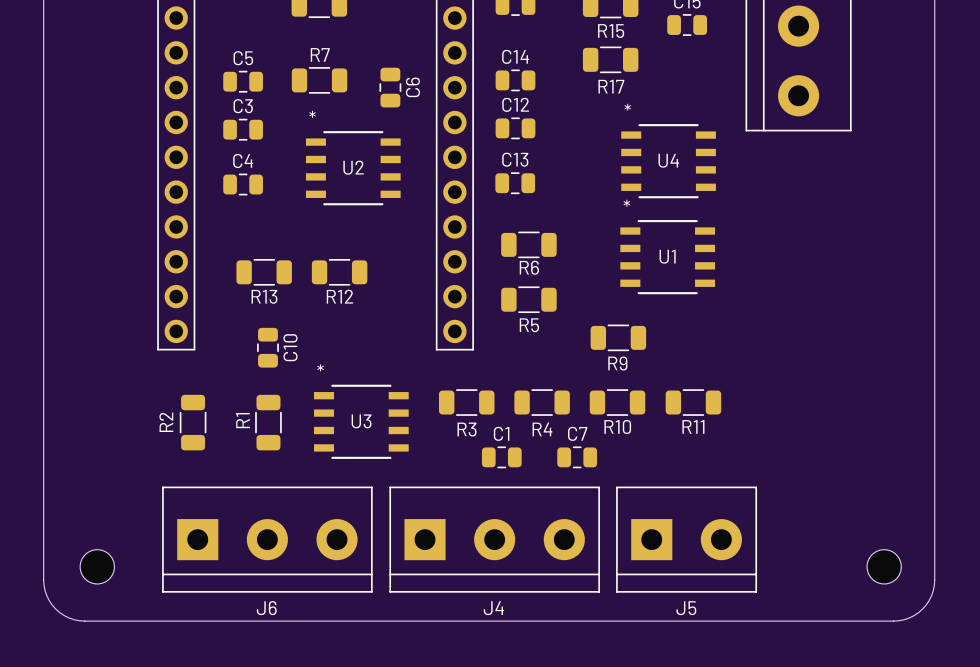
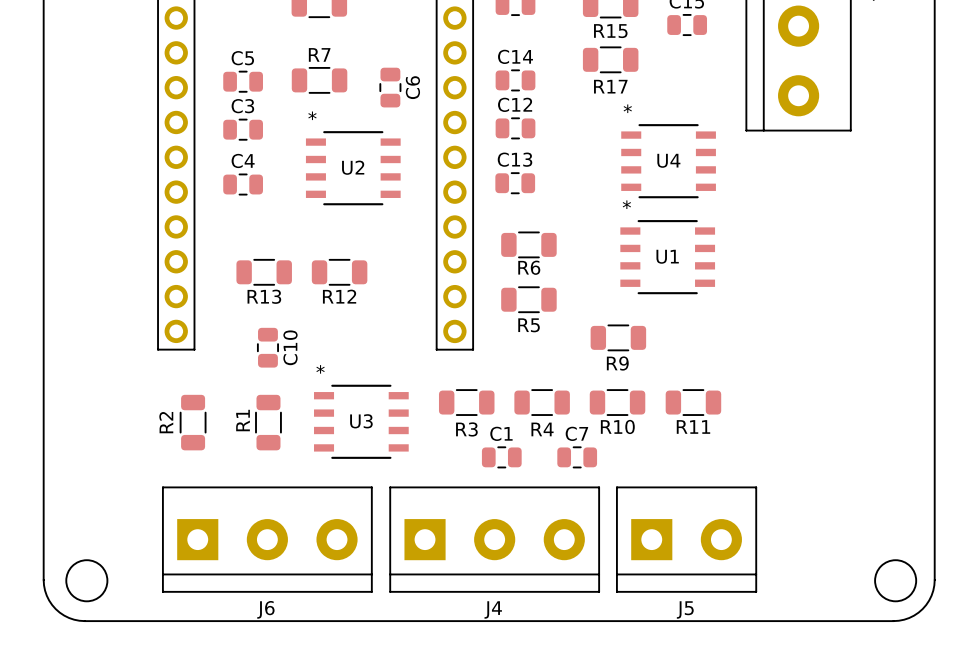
round board edge: none -> [65, 559, 108, 602]
round board edge: none -> [874, 559, 917, 602]
part: (97, 566) -> none
part: (884, 566) -> none

